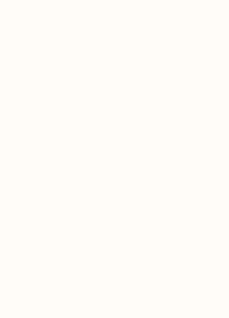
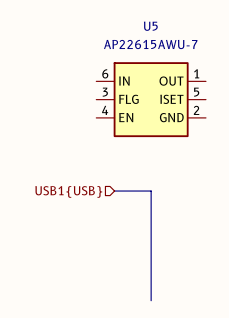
U5: none -> (151, 99)
hierarchical label: none -> USB1{USB} (68, 191)
bus: none -> (114, 191) (151, 191) (151, 300)

